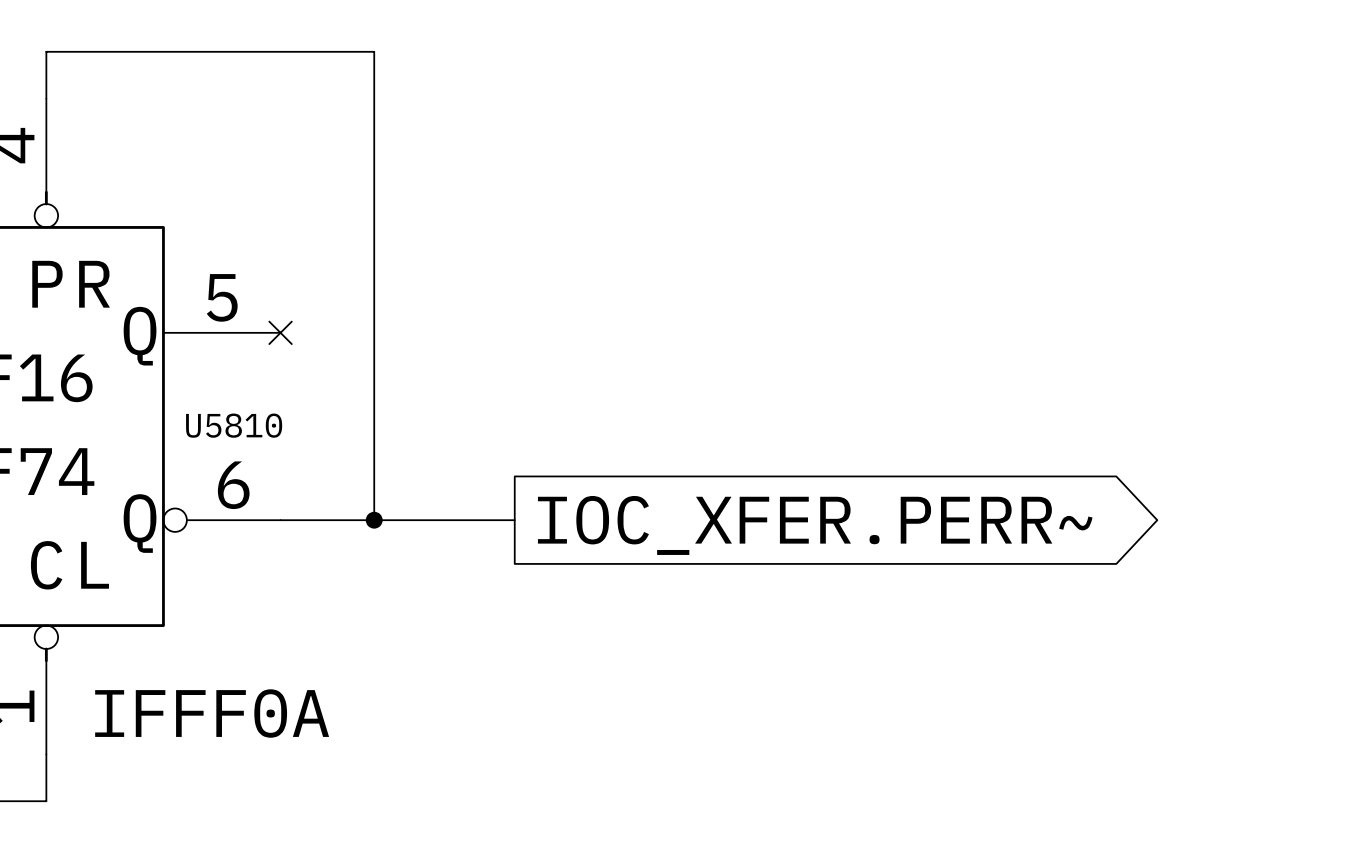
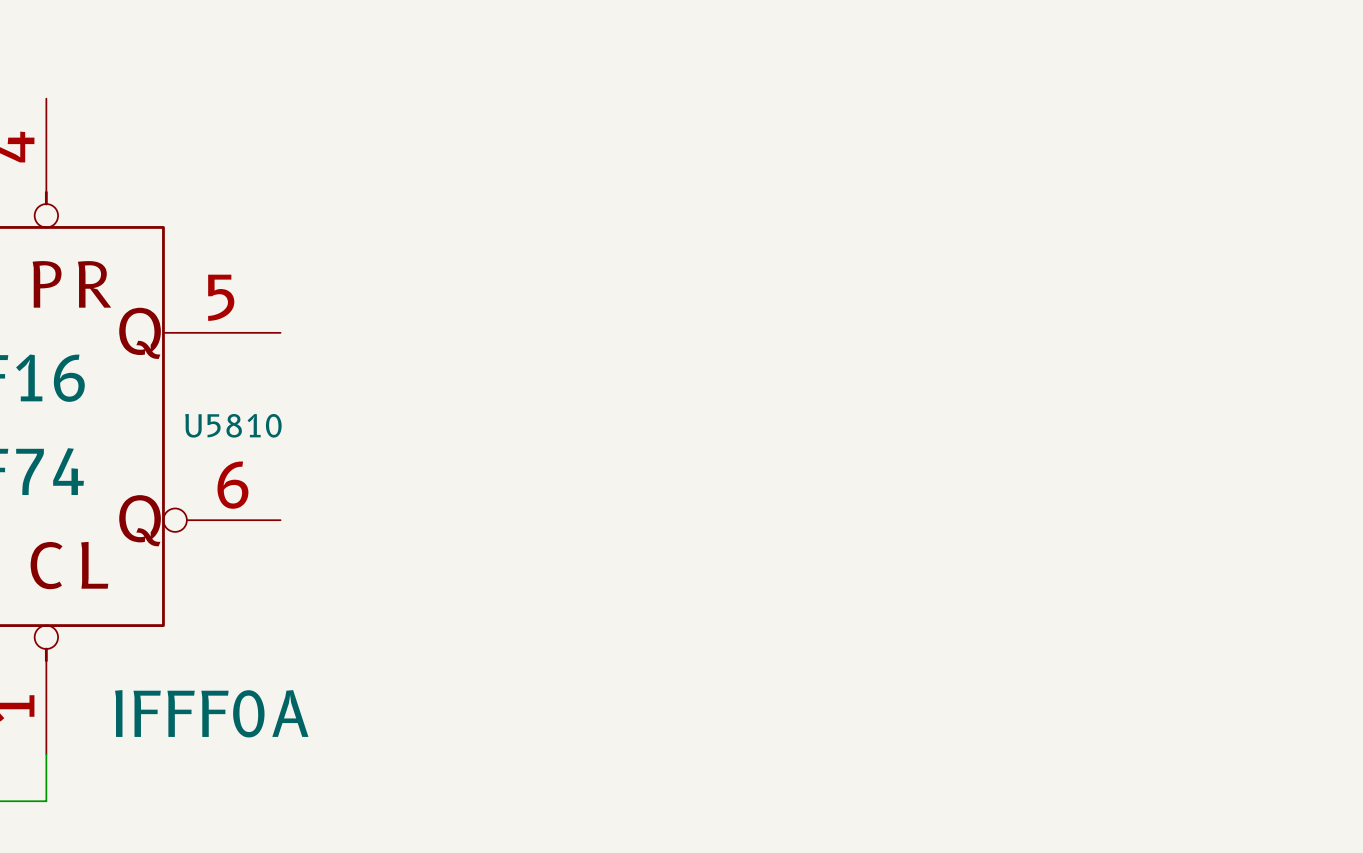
wire: (46, 98) (46, 51) (374, 51) (374, 520) -> none
no-connect mark: (280, 332) -> none
wire: (280, 520) (514, 520) -> none
junction: (374, 520) -> none
global label: IOC_XFER.PERR~ (815, 525) -> none

